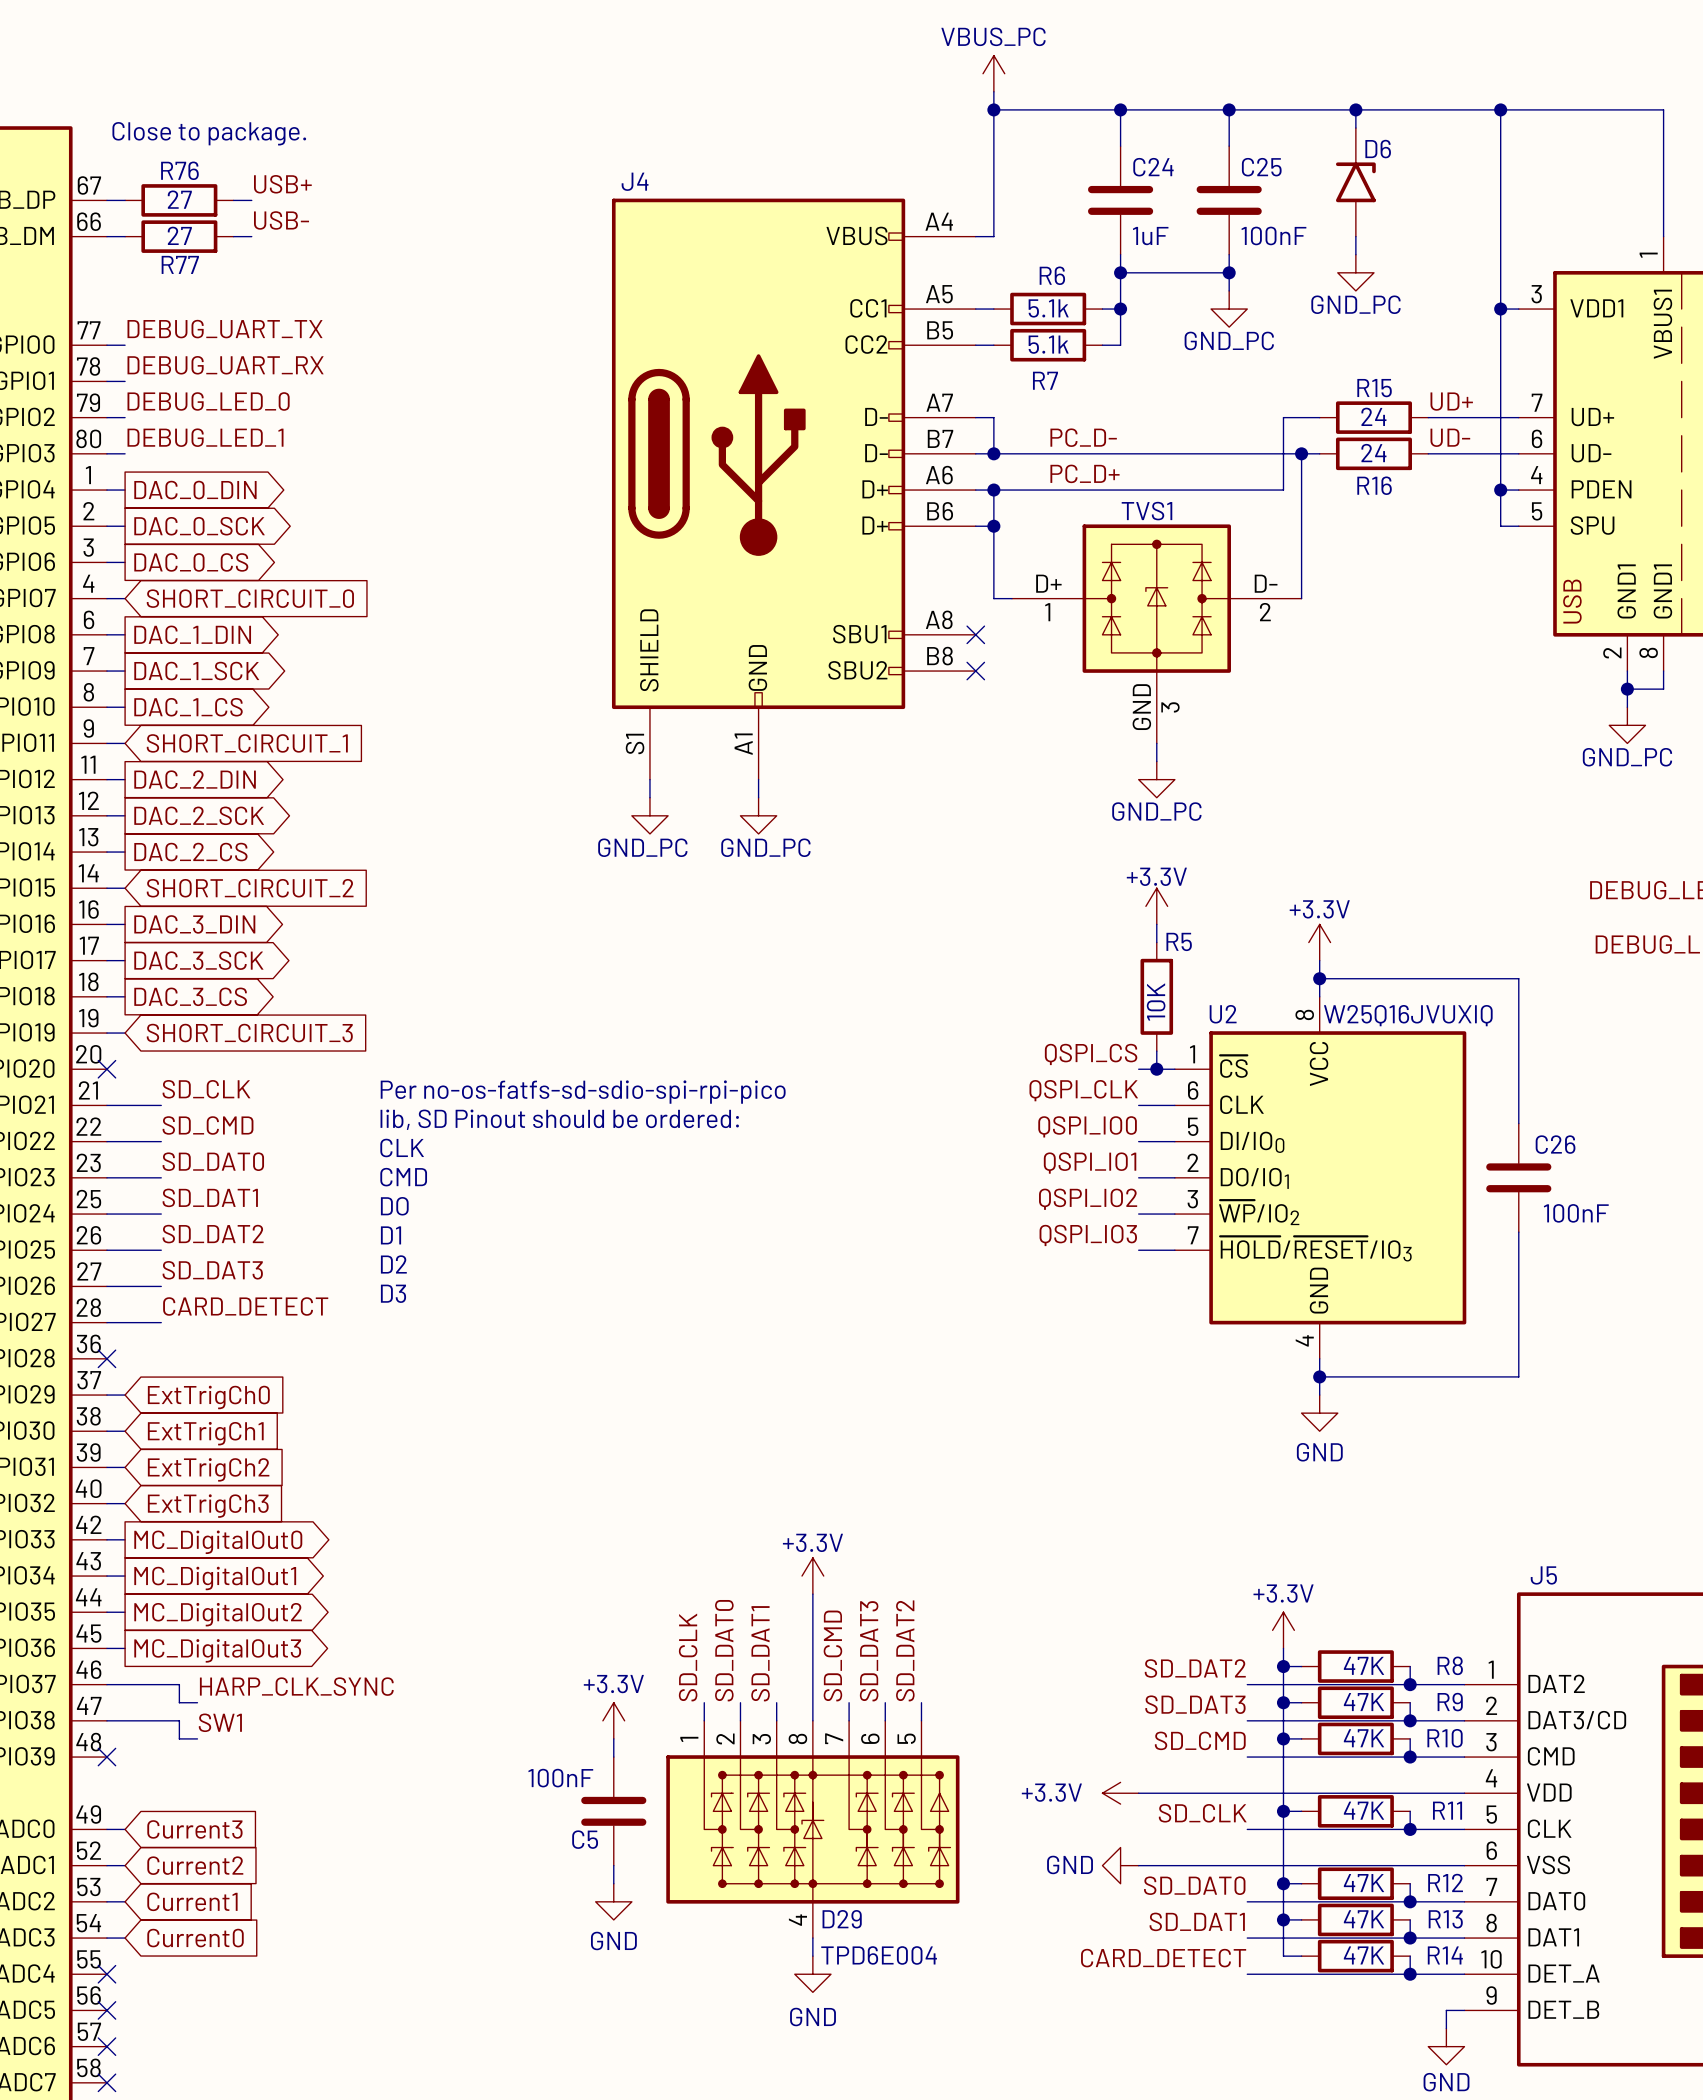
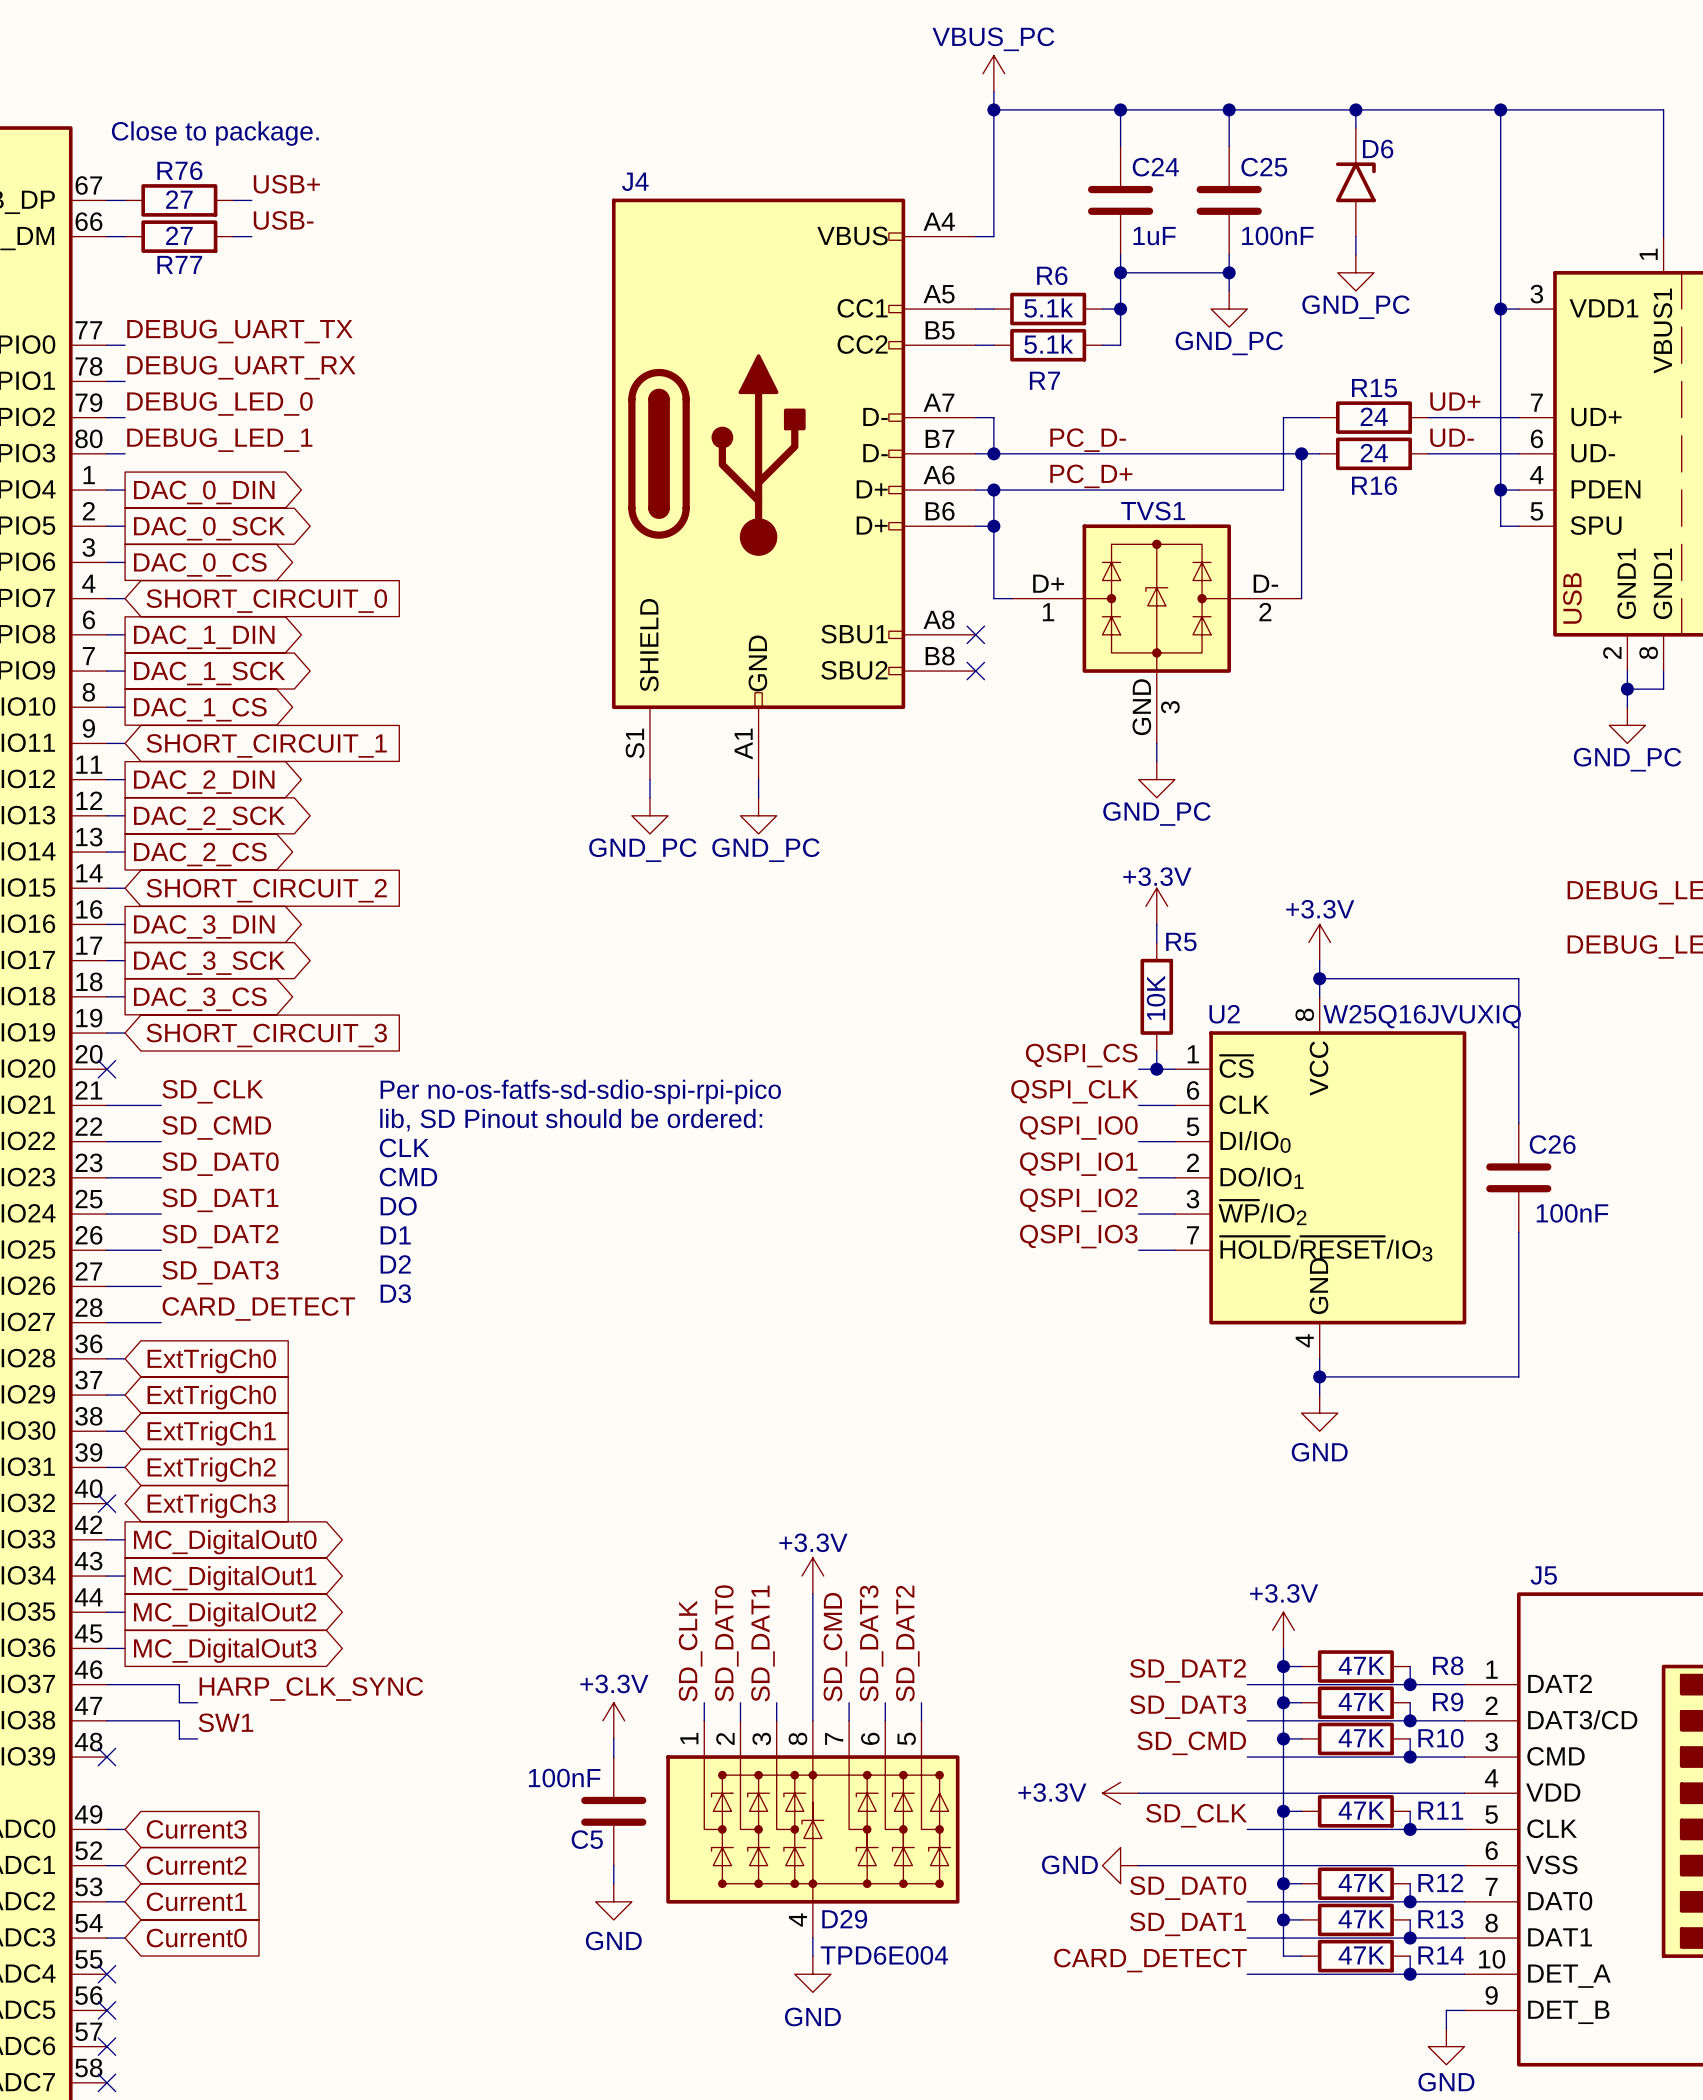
no-connect mark: (106, 1358) -> none
global label: none -> ExtTrigCh0 (211, 1361)
wire: (106, 1503) (125, 1503) -> (106, 1358) (125, 1358)
no-connect mark: none -> (106, 1503)

